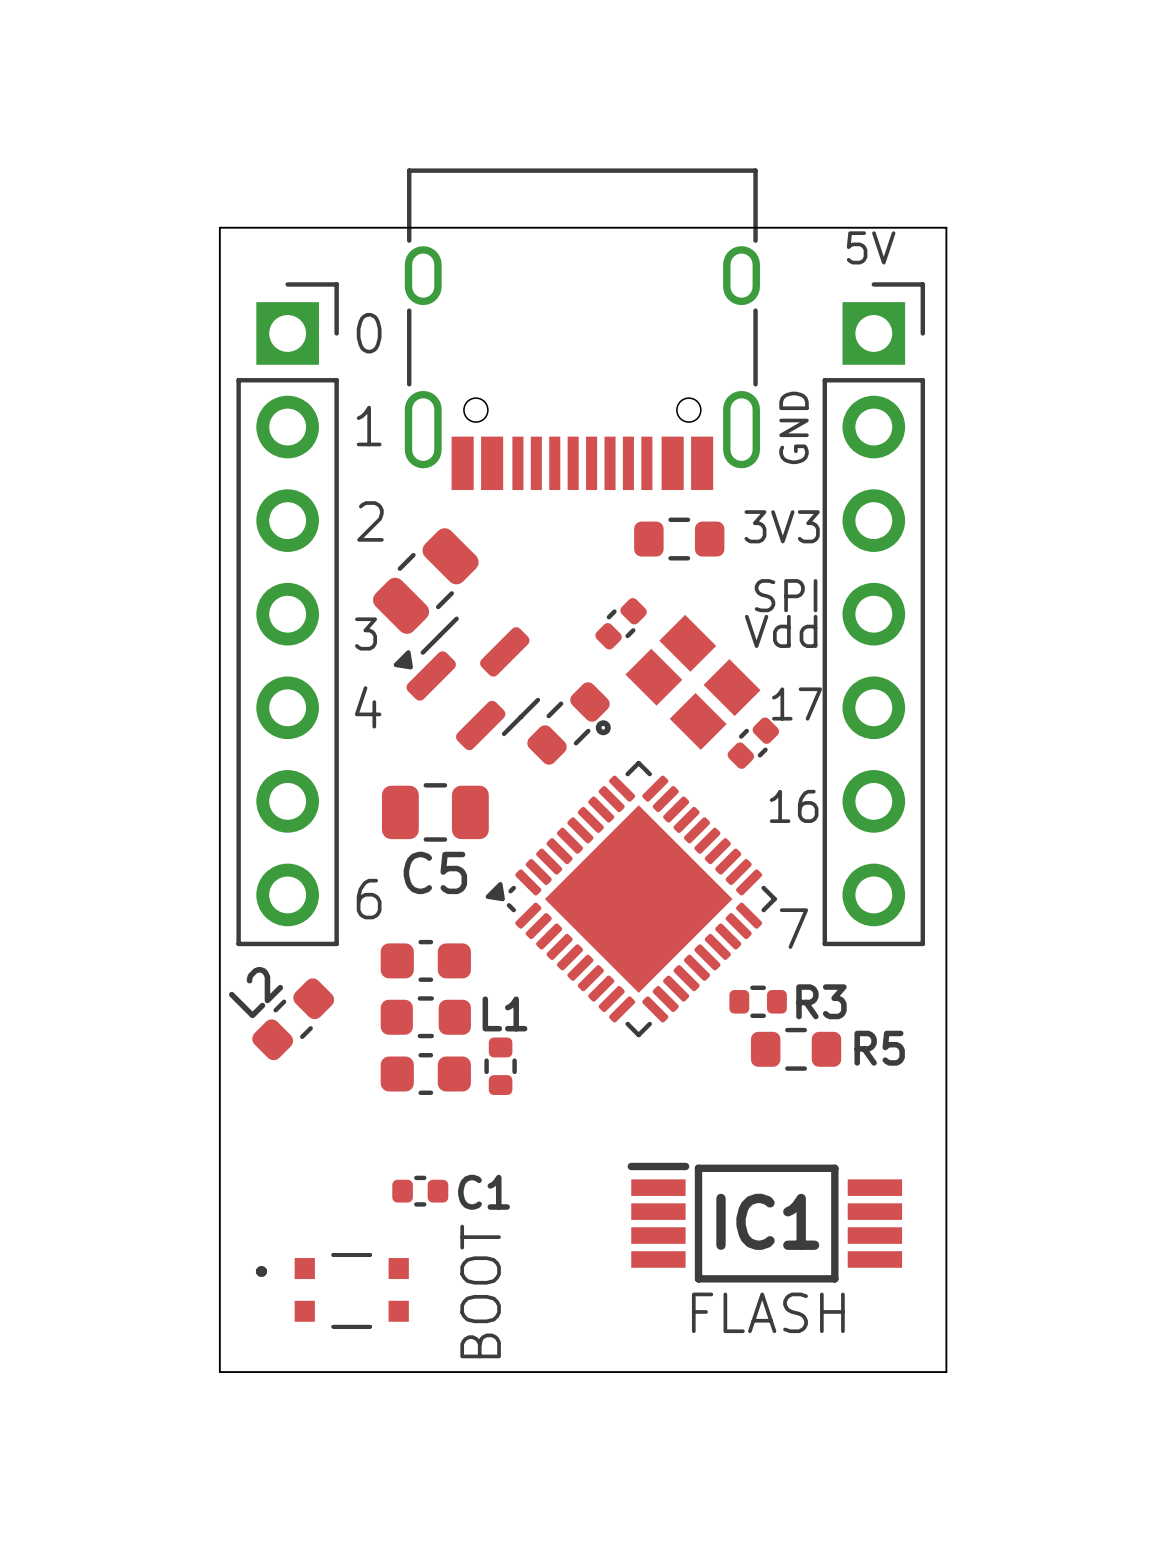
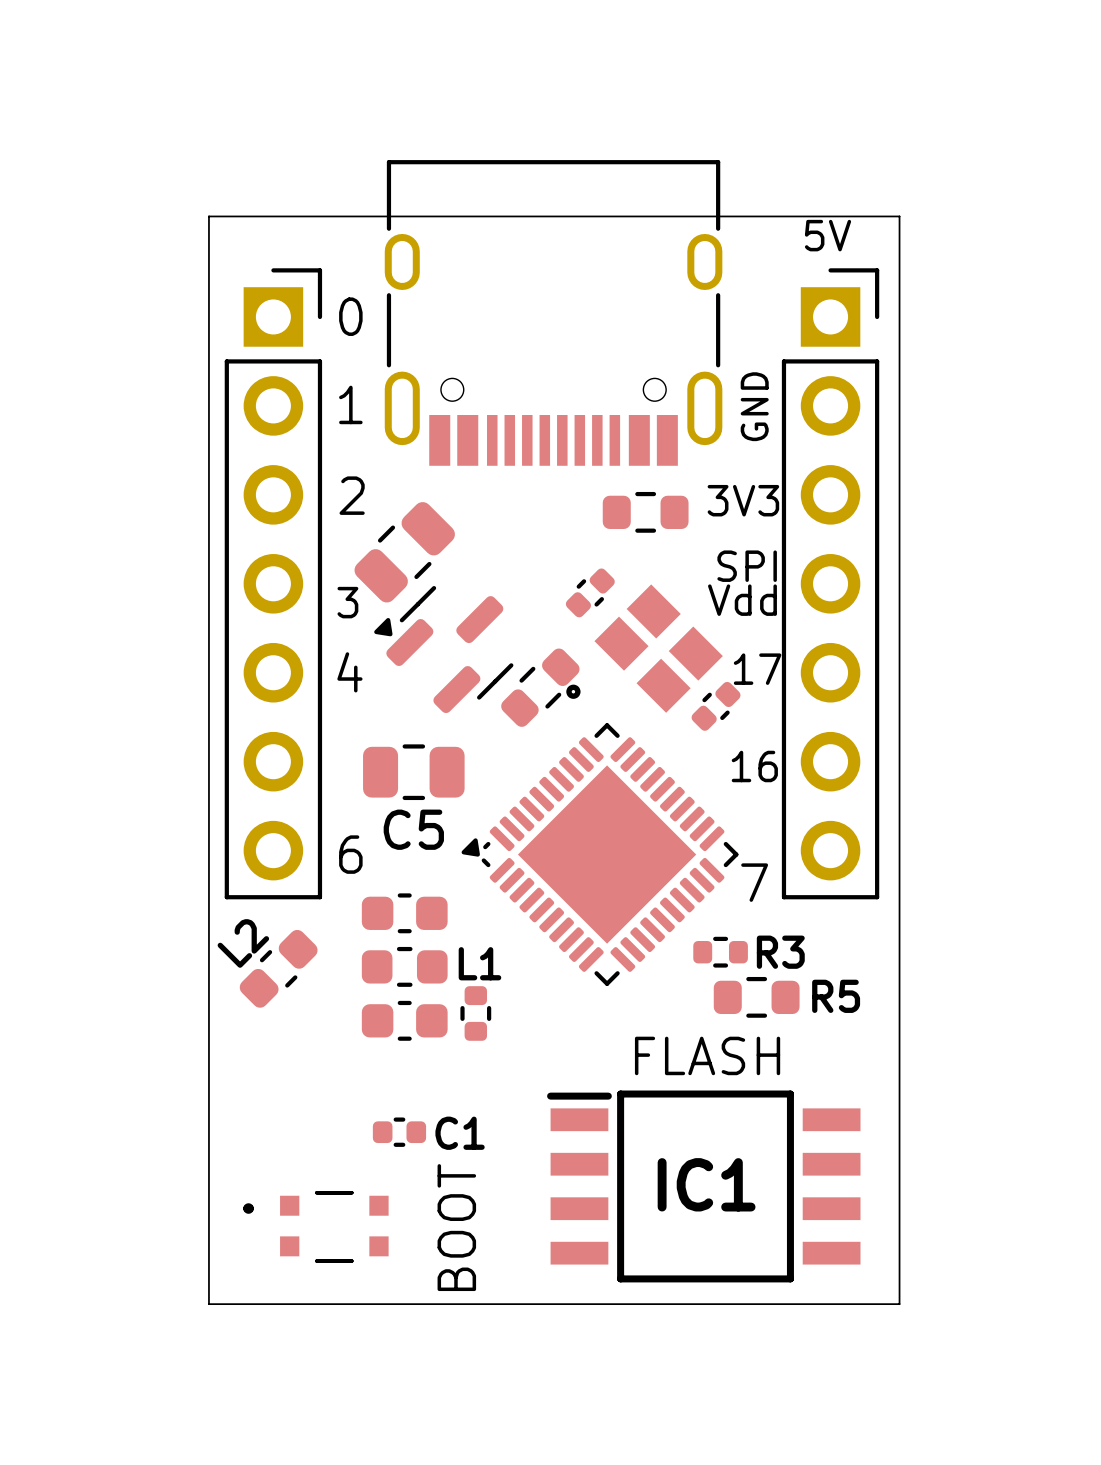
IC1 footprint: [627, 1162, 903, 1283] -> [547, 1090, 861, 1283]
text position: FLASH (768, 1312) -> FLASH (707, 1055)

